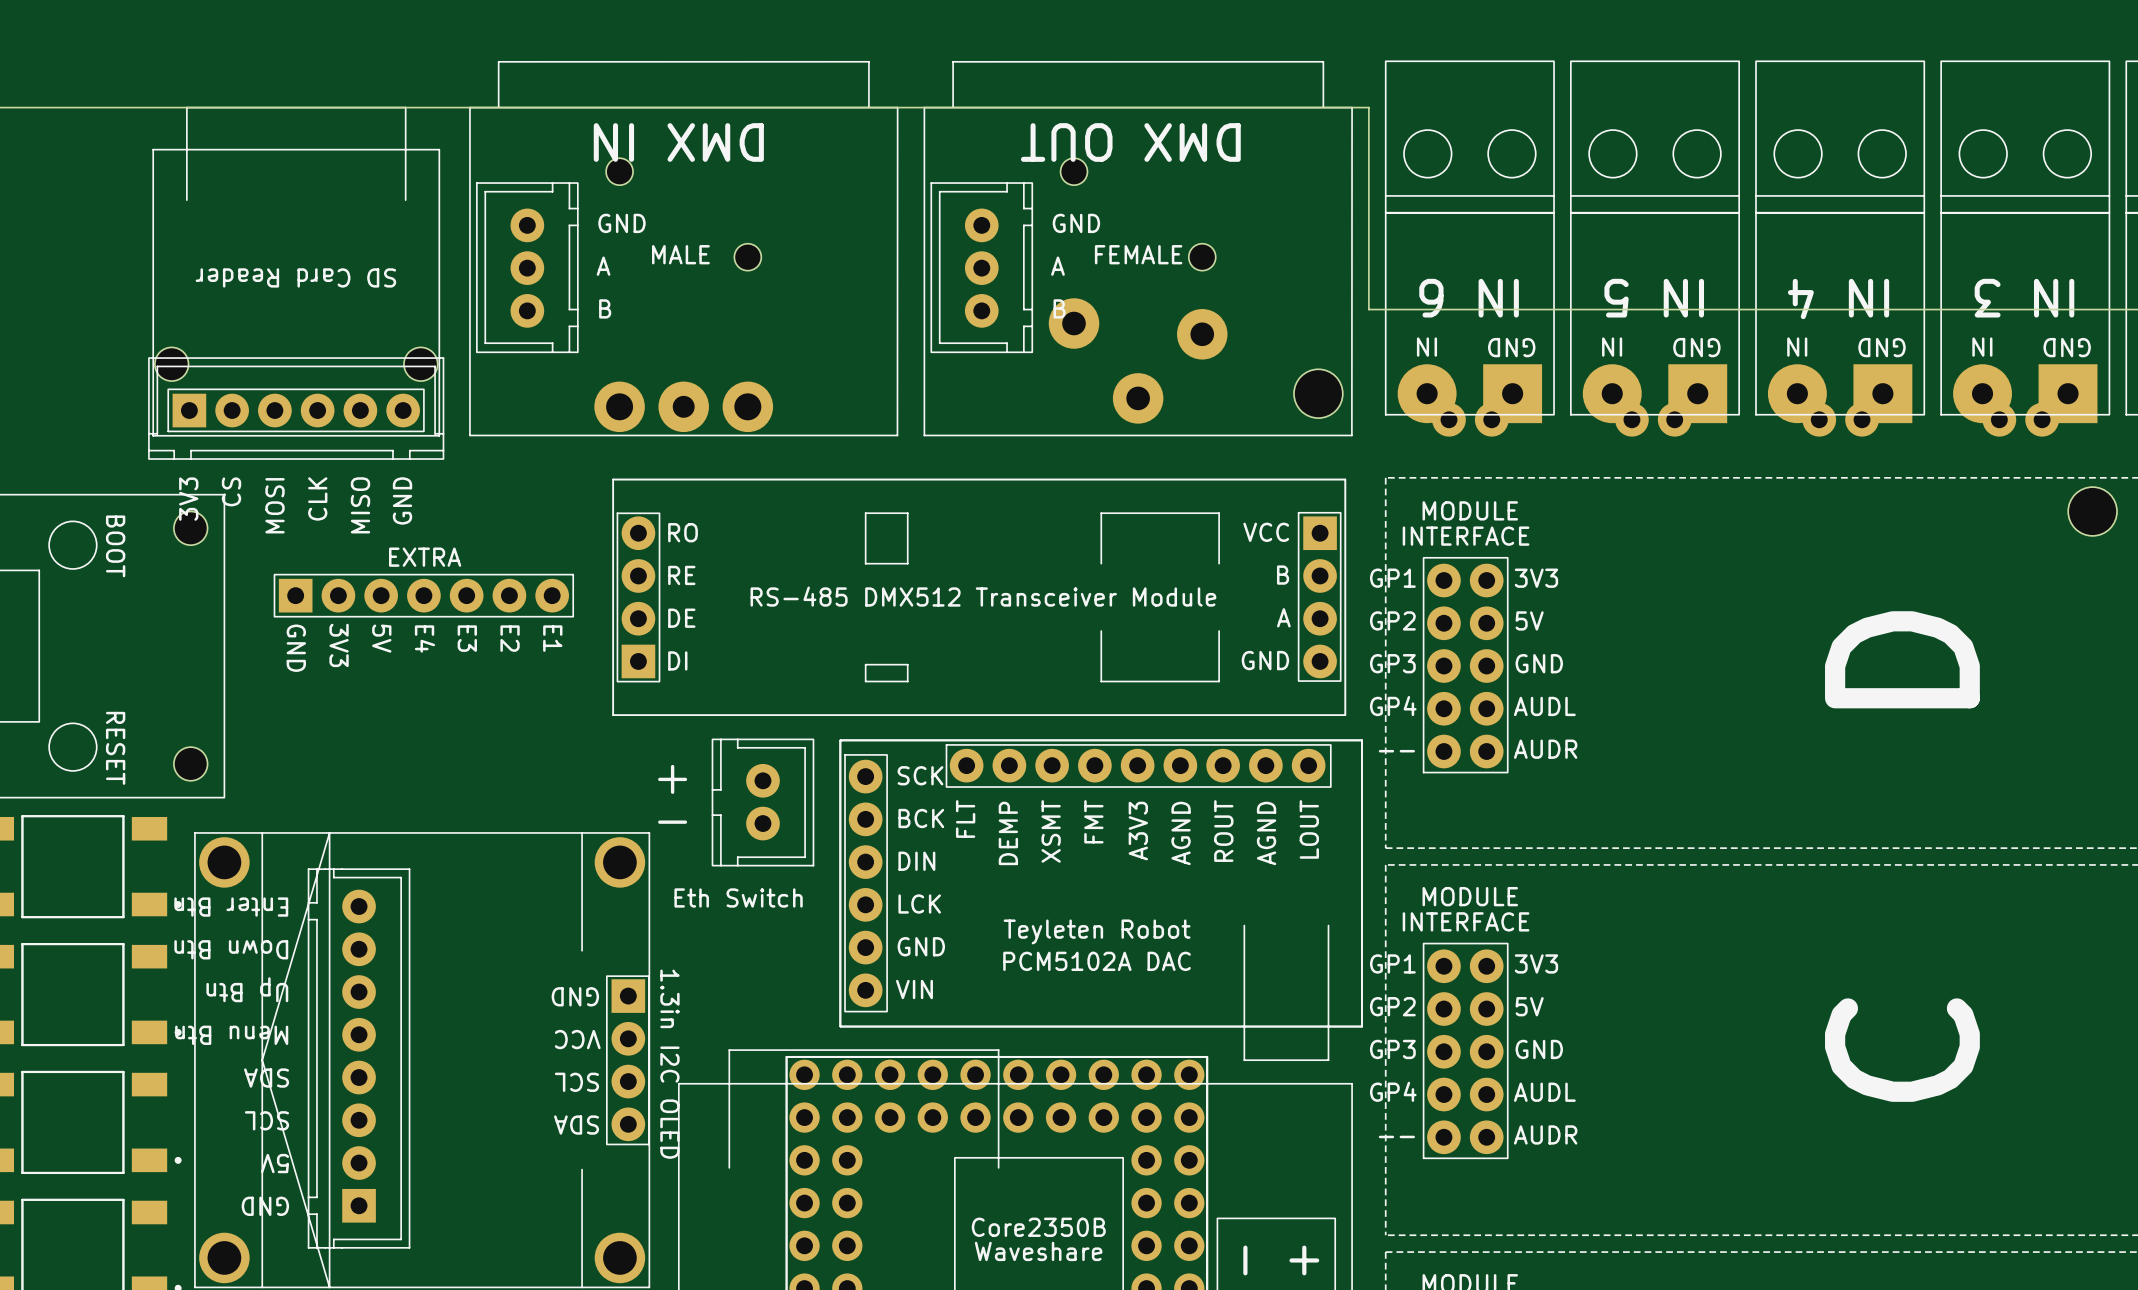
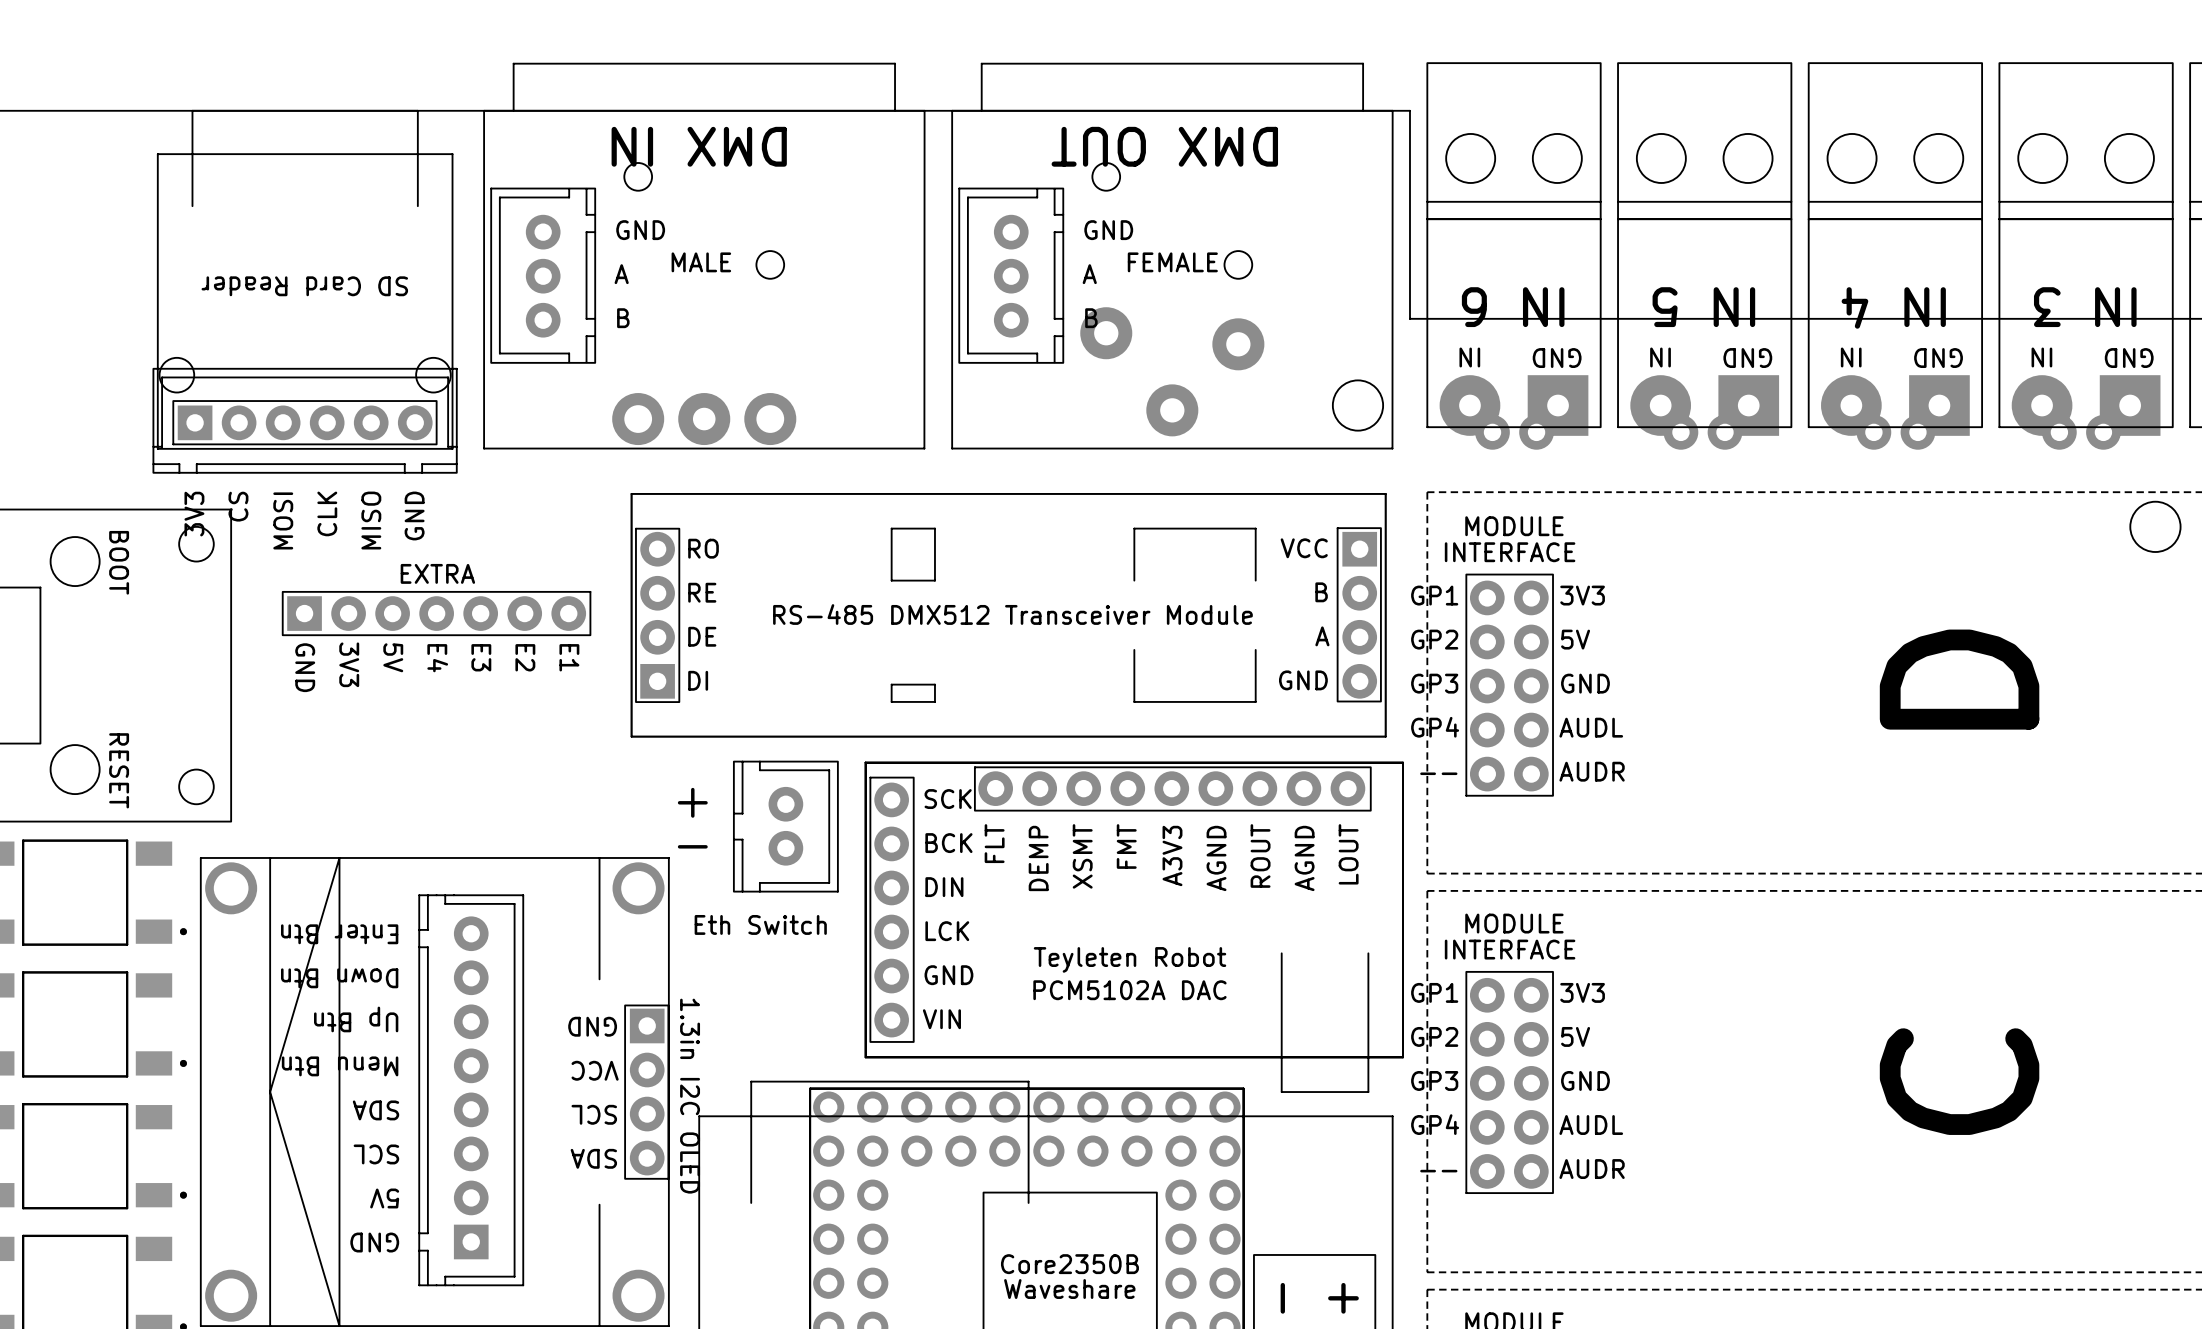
part position: (359, 1058) -> (471, 1090)

